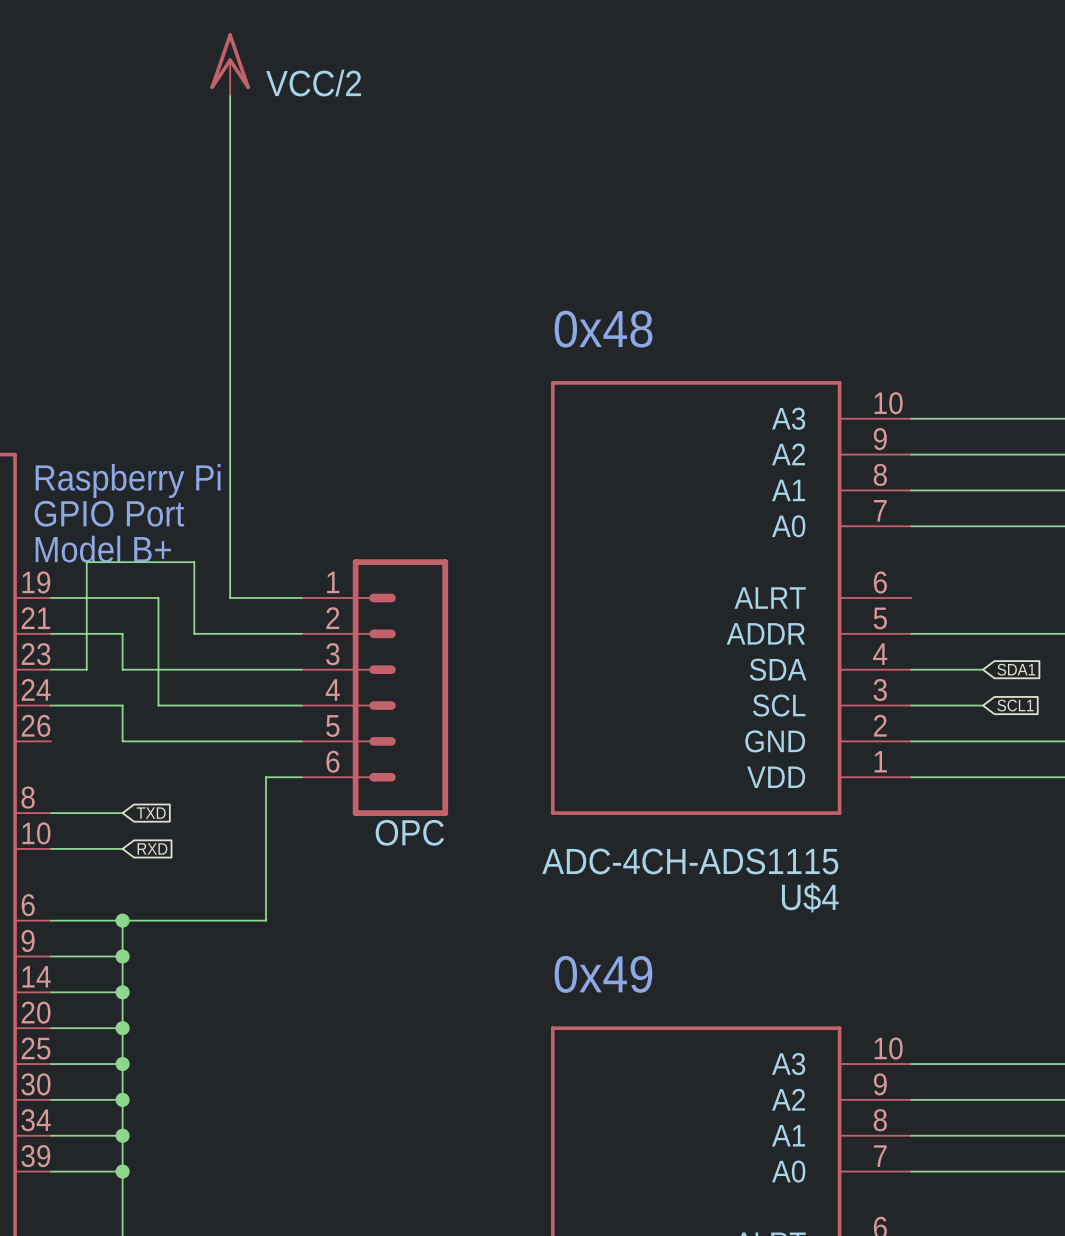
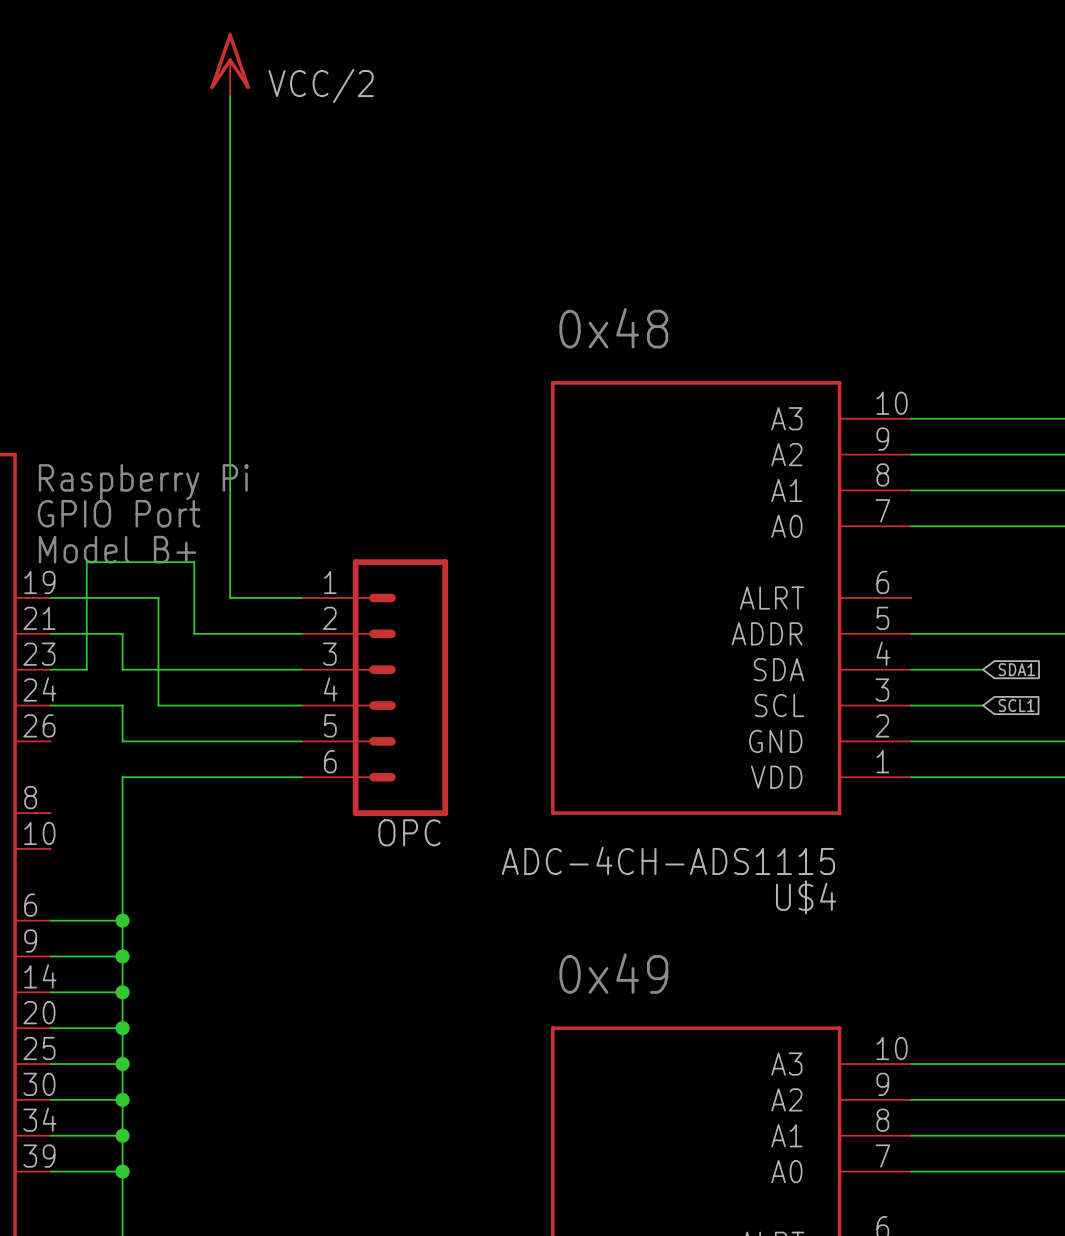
wire: (266, 777) (266, 920) (122, 920) -> (266, 777) (122, 777) (122, 920)
wire: (50, 813) (122, 813) -> none
global label: TXD (151, 813) -> none
wire: (50, 848) (122, 848) -> none
global label: RXD (152, 848) -> none

